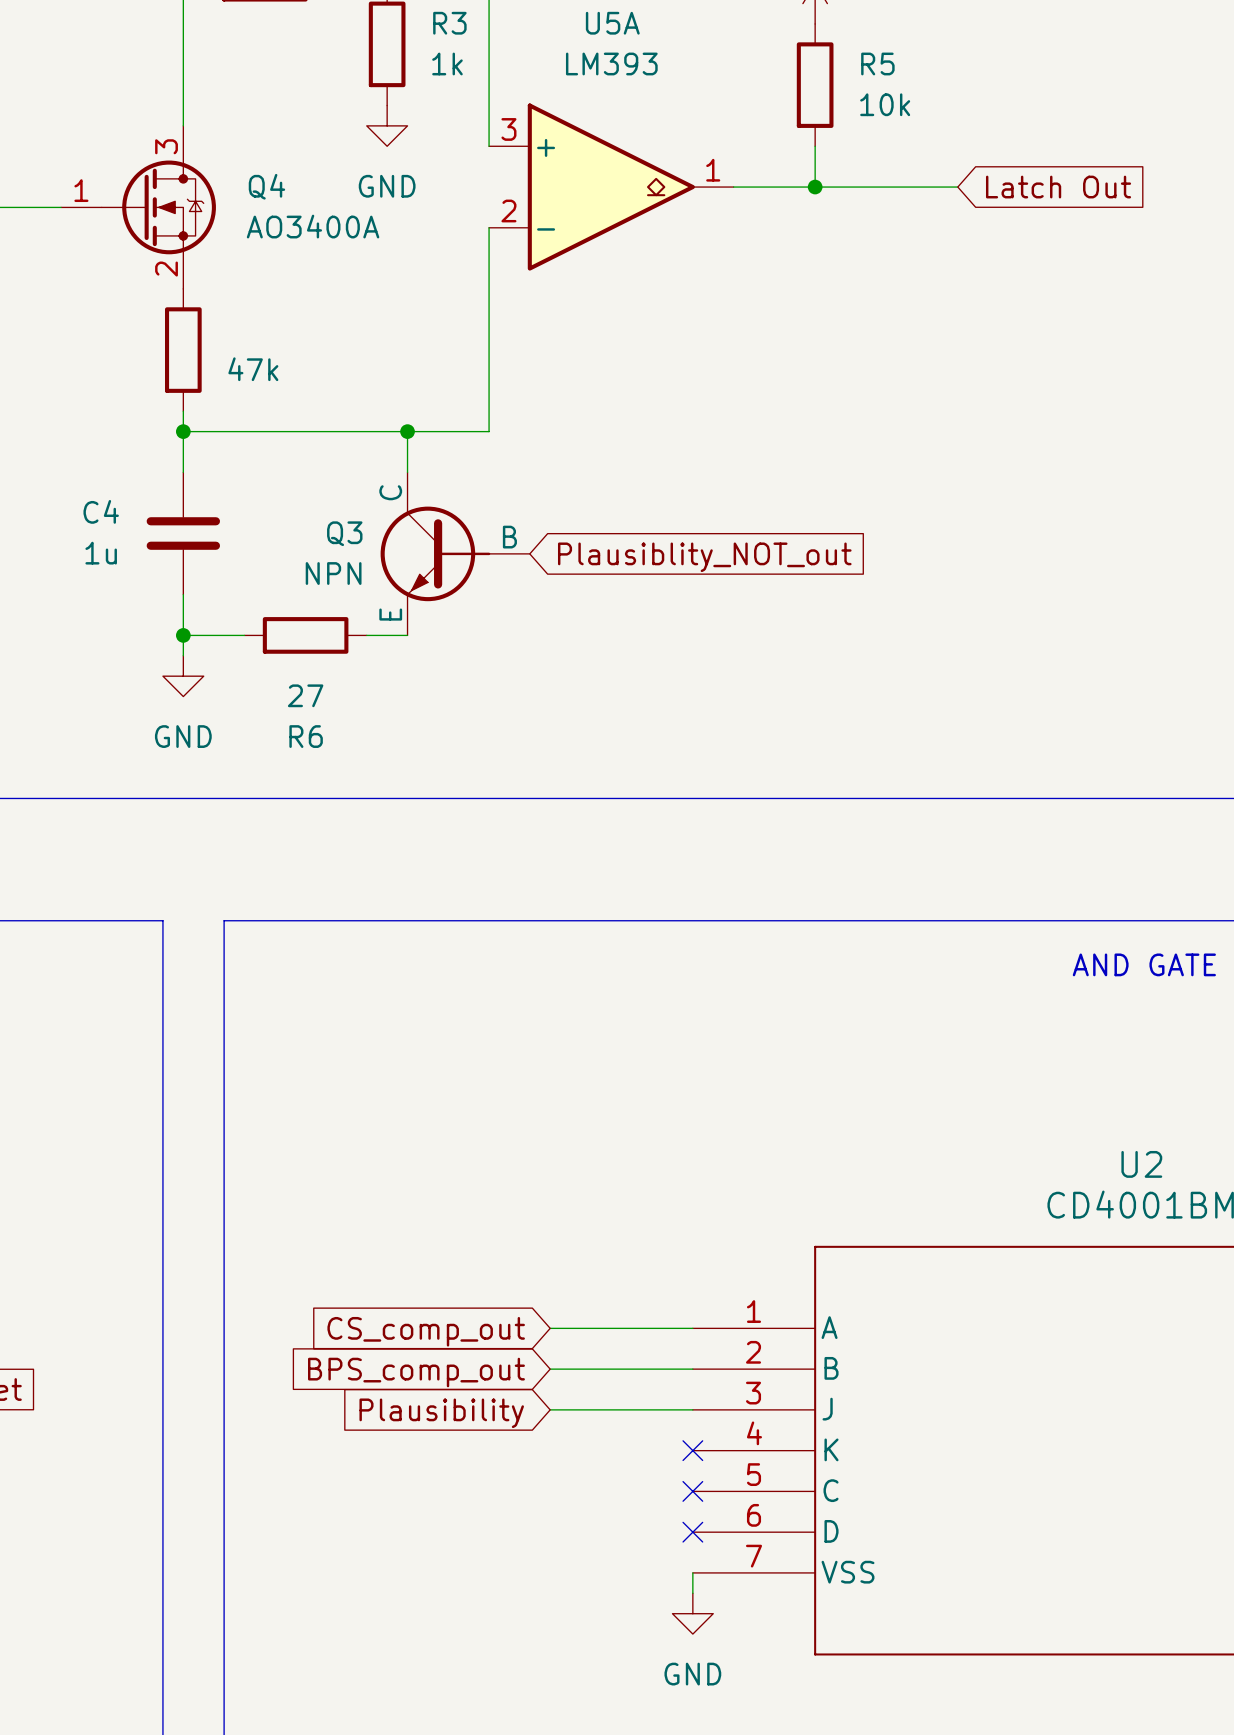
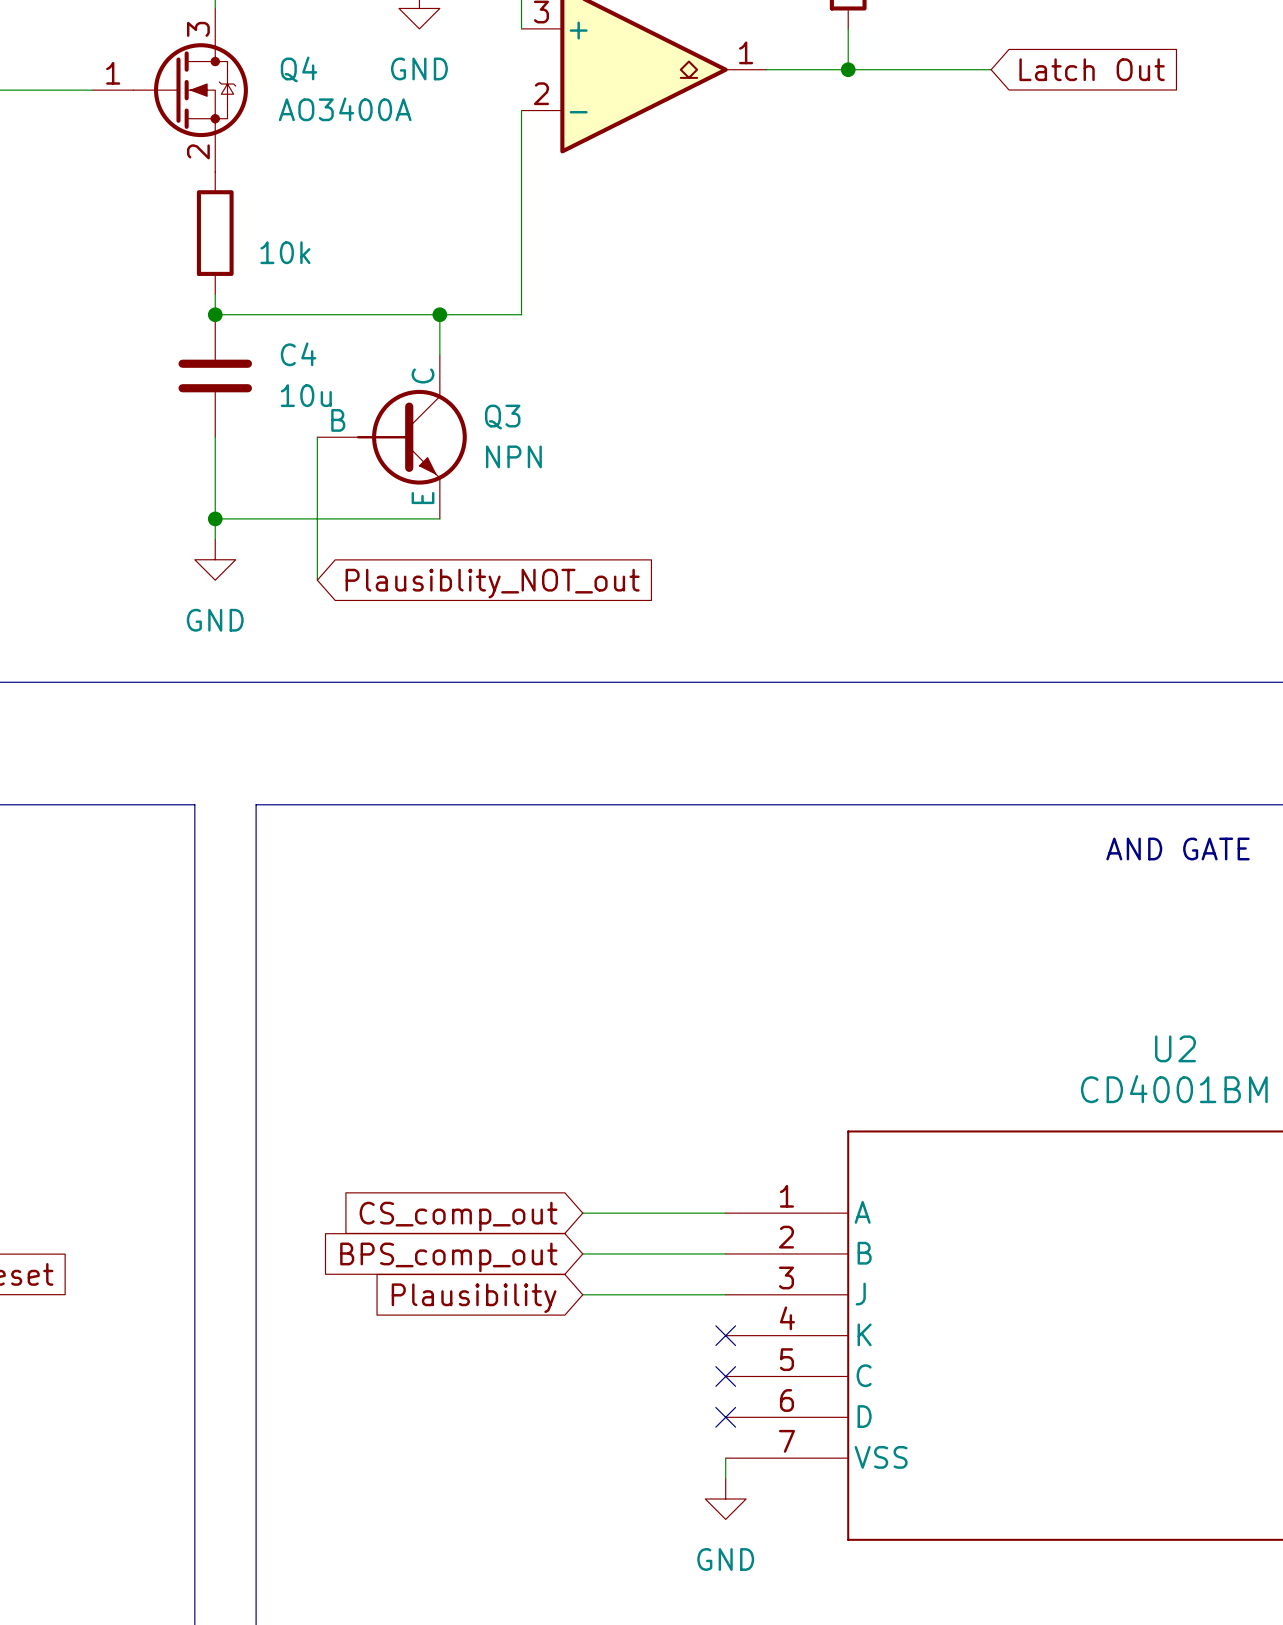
part value: 47k (253, 369) -> 10k (285, 252)
C4 name position: C4 (101, 511) -> C4 (298, 354)
C4 position: (183, 533) -> (215, 375)
C4 value: 1u (101, 553) -> 10u (306, 395)
wire: none -> (317, 437) (317, 580)
Q3 flip: as is (435, 553) -> left-right (411, 437)
global label position: Plausiblity_NOT_out (704, 557) -> Plausiblity_NOT_out (492, 583)
wire: none -> (276, 518) (399, 518)
R6: 27 (305, 635) -> none

